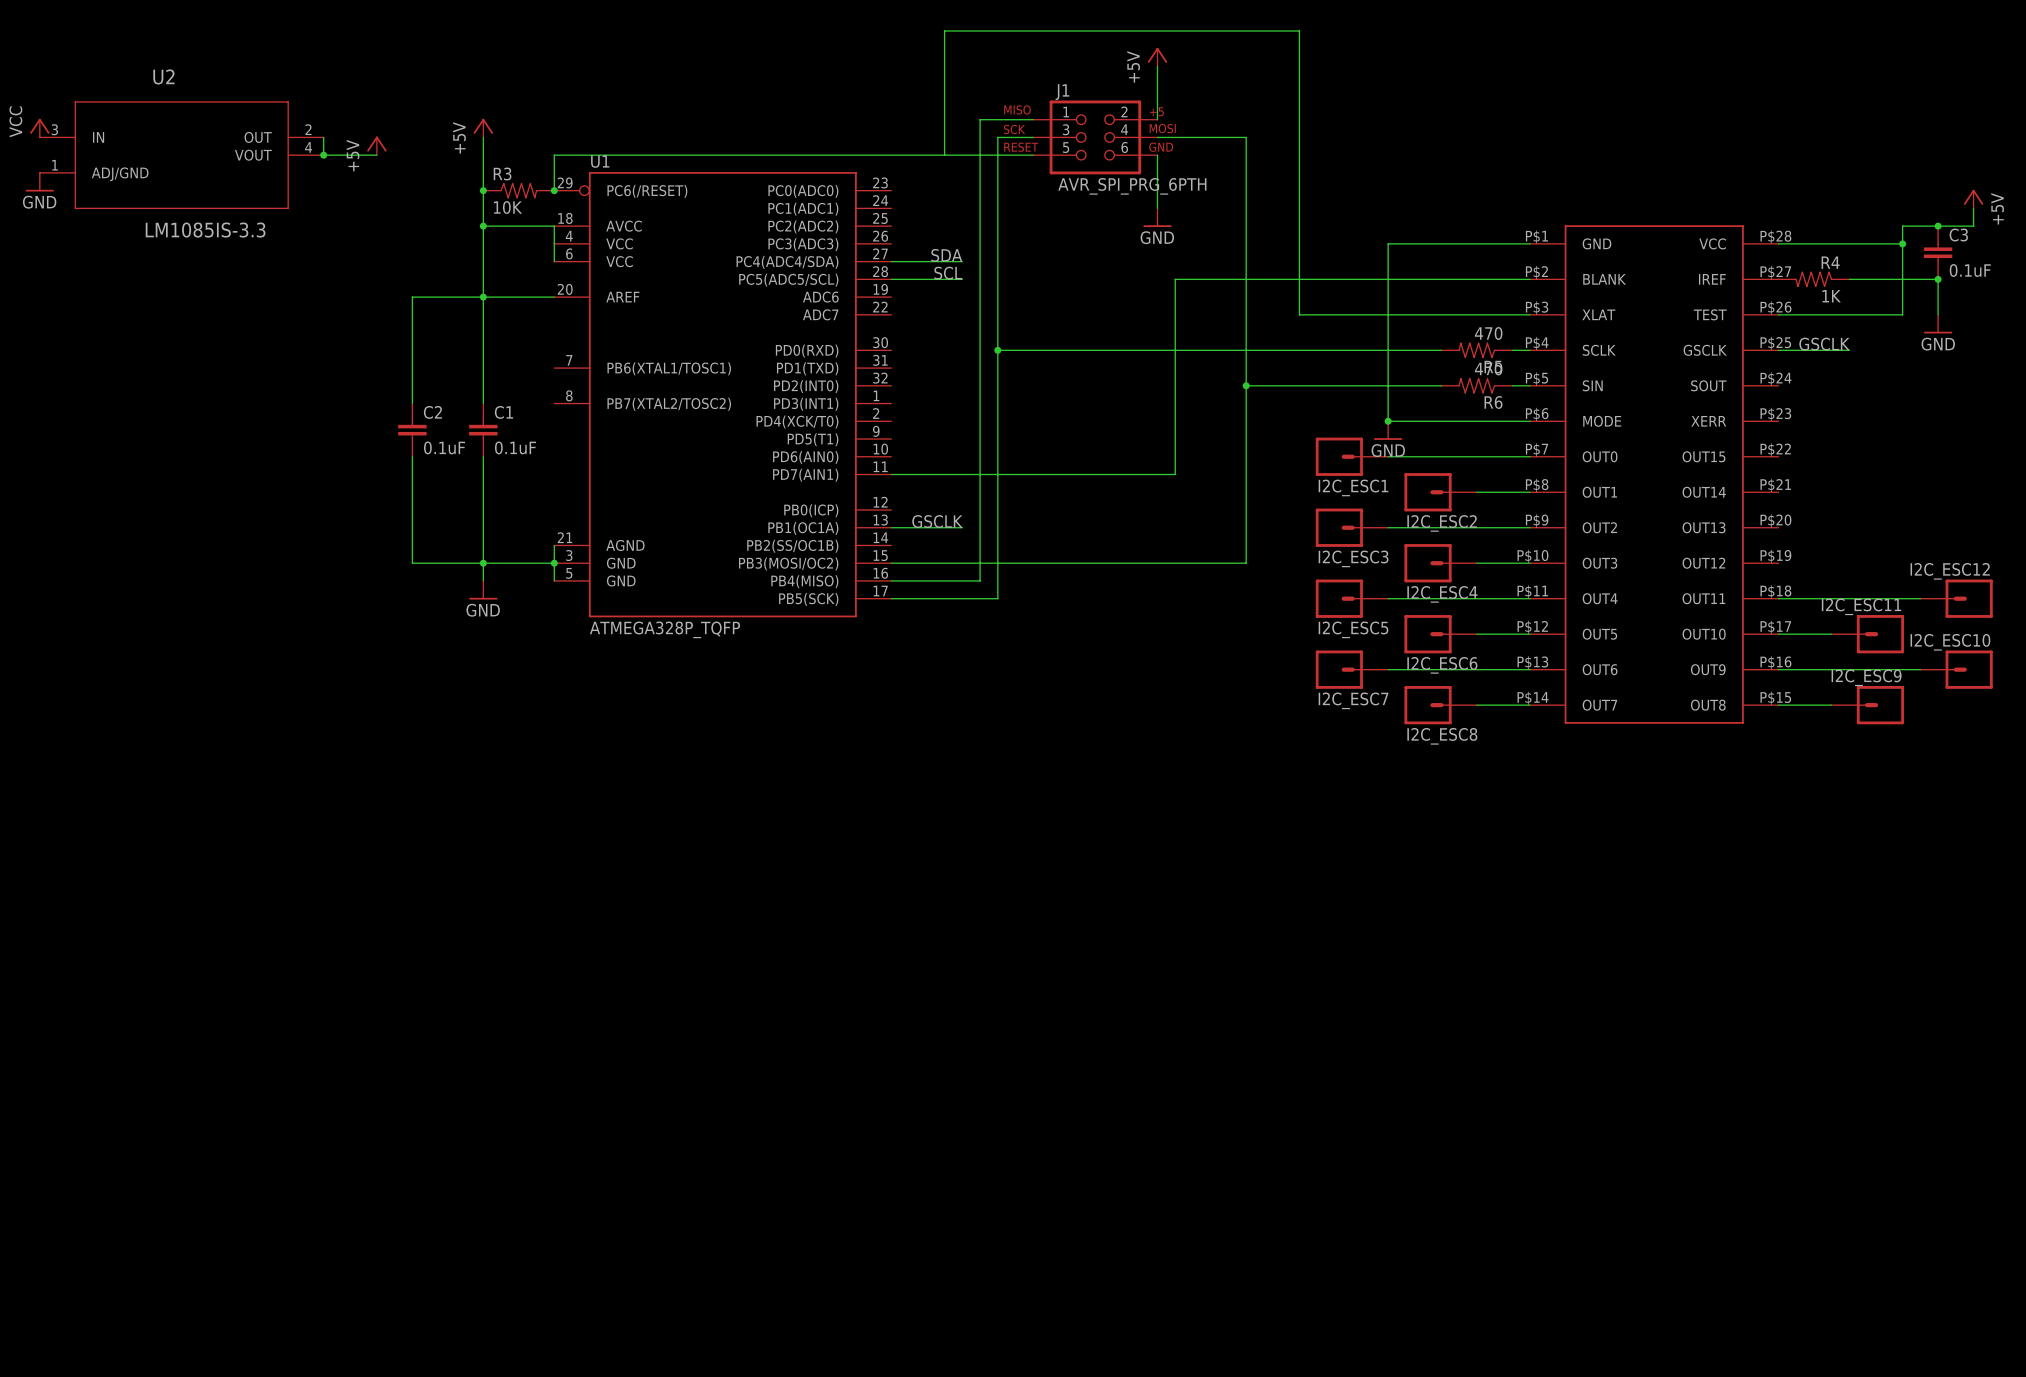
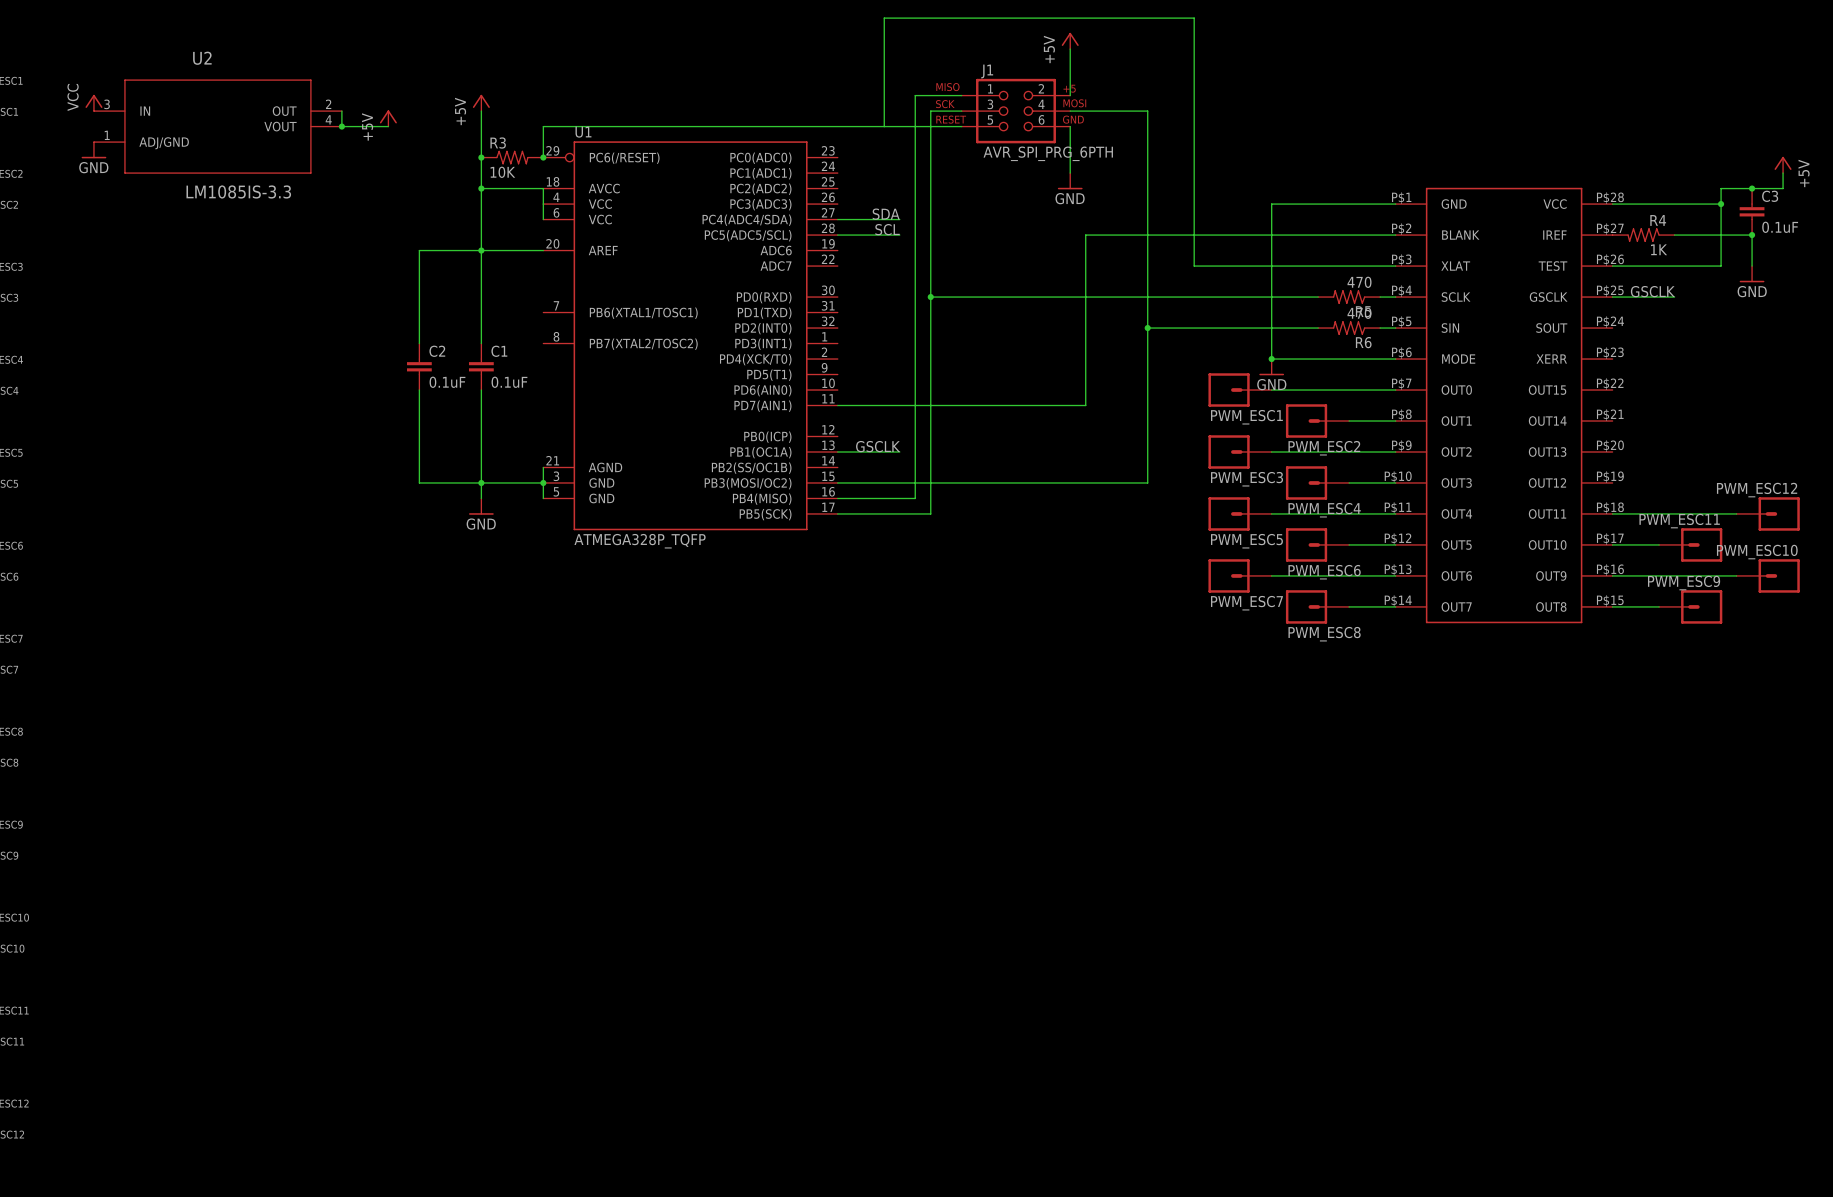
I2C_ESC1 name: I2C_ESC1 (1353, 487) -> PWM_ESC1 (1246, 417)
I2C_ESC2 name: I2C_ESC2 (1442, 523) -> PWM_ESC2 (1324, 448)
I2C_ESC3 name: I2C_ESC3 (1353, 558) -> PWM_ESC3 (1247, 479)
I2C_ESC12 name: I2C_ESC12 (1950, 571) -> PWM_ESC12 (1757, 490)
I2C_ESC4 name: I2C_ESC4 (1442, 594) -> PWM_ESC4 (1324, 510)
I2C_ESC11 name: I2C_ESC11 (1861, 606) -> PWM_ESC11 (1679, 521)
I2C_ESC5 name: I2C_ESC5 (1353, 629) -> PWM_ESC5 (1246, 541)
I2C_ESC10 name: I2C_ESC10 (1950, 642) -> PWM_ESC10 (1757, 552)
I2C_ESC6 name: I2C_ESC6 (1442, 665) -> PWM_ESC6 (1324, 572)
I2C_ESC9 name: I2C_ESC9 (1866, 677) -> PWM_ESC9 (1684, 583)
I2C_ESC7 name: I2C_ESC7 (1353, 700) -> PWM_ESC7 (1246, 603)
I2C_ESC8 name: I2C_ESC8 (1442, 736) -> PWM_ESC8 (1324, 634)

